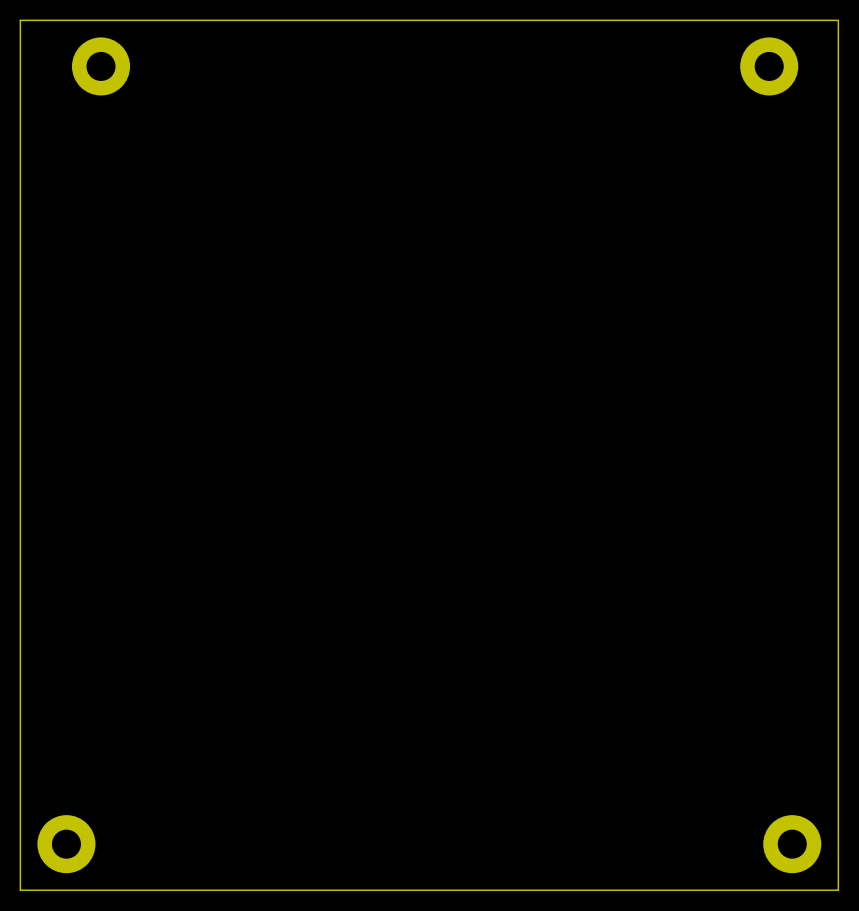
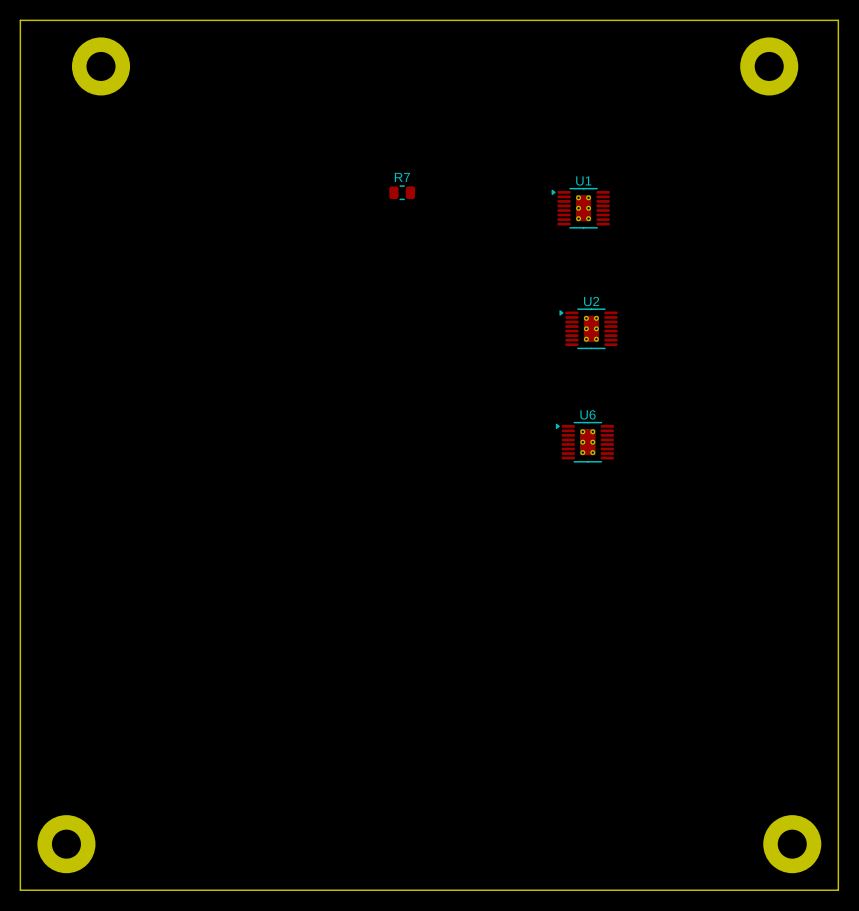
R7: none -> (402, 192)
U1: none -> (580, 208)
U2: none -> (588, 328)
U6: none -> (584, 442)

